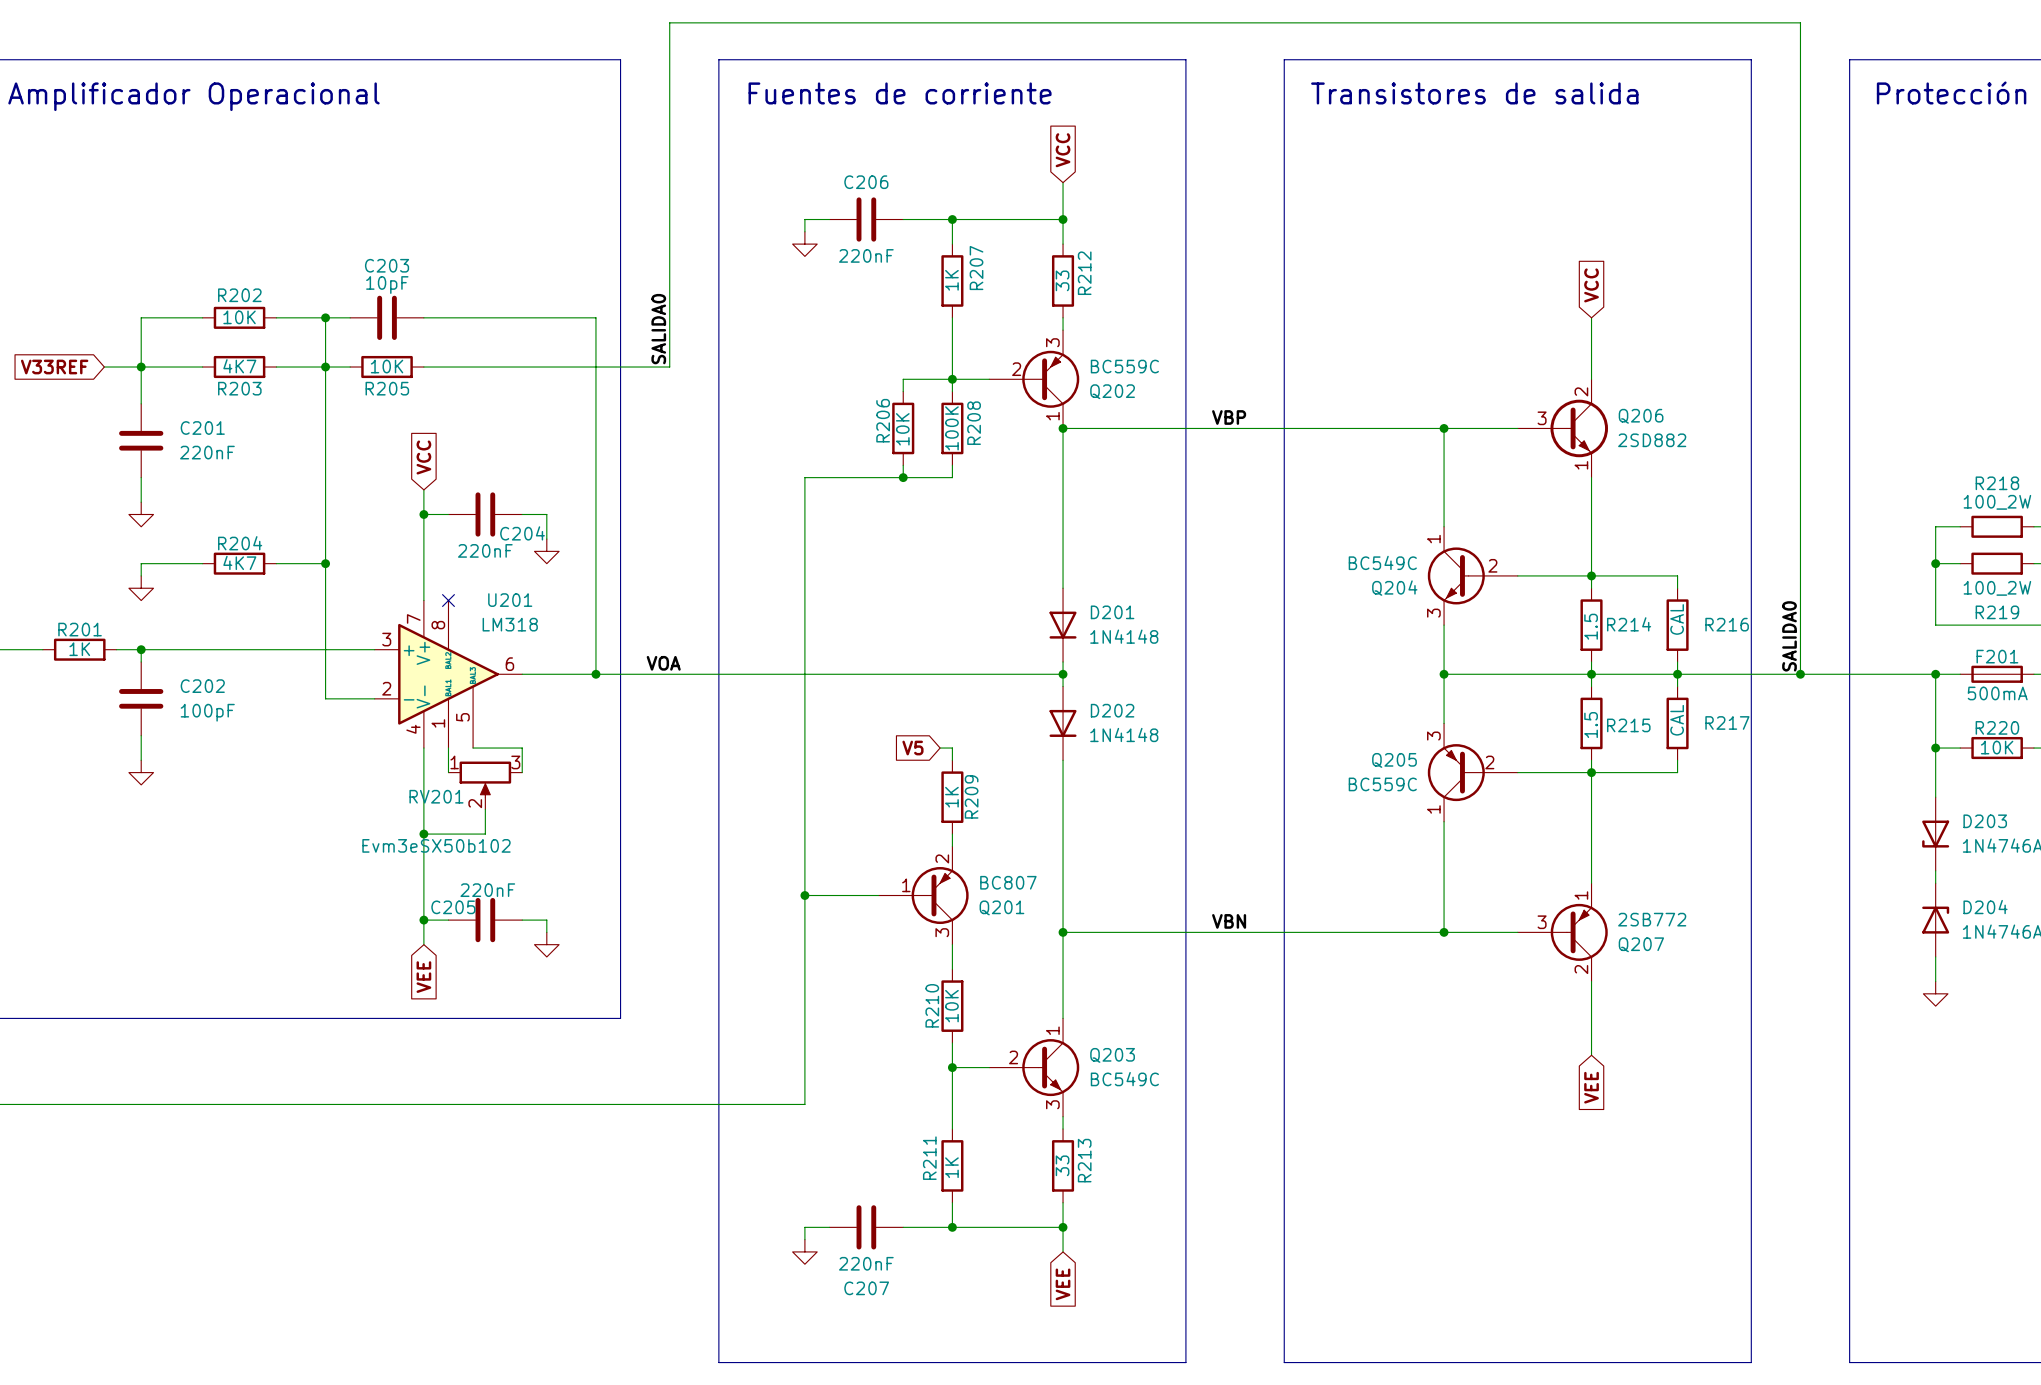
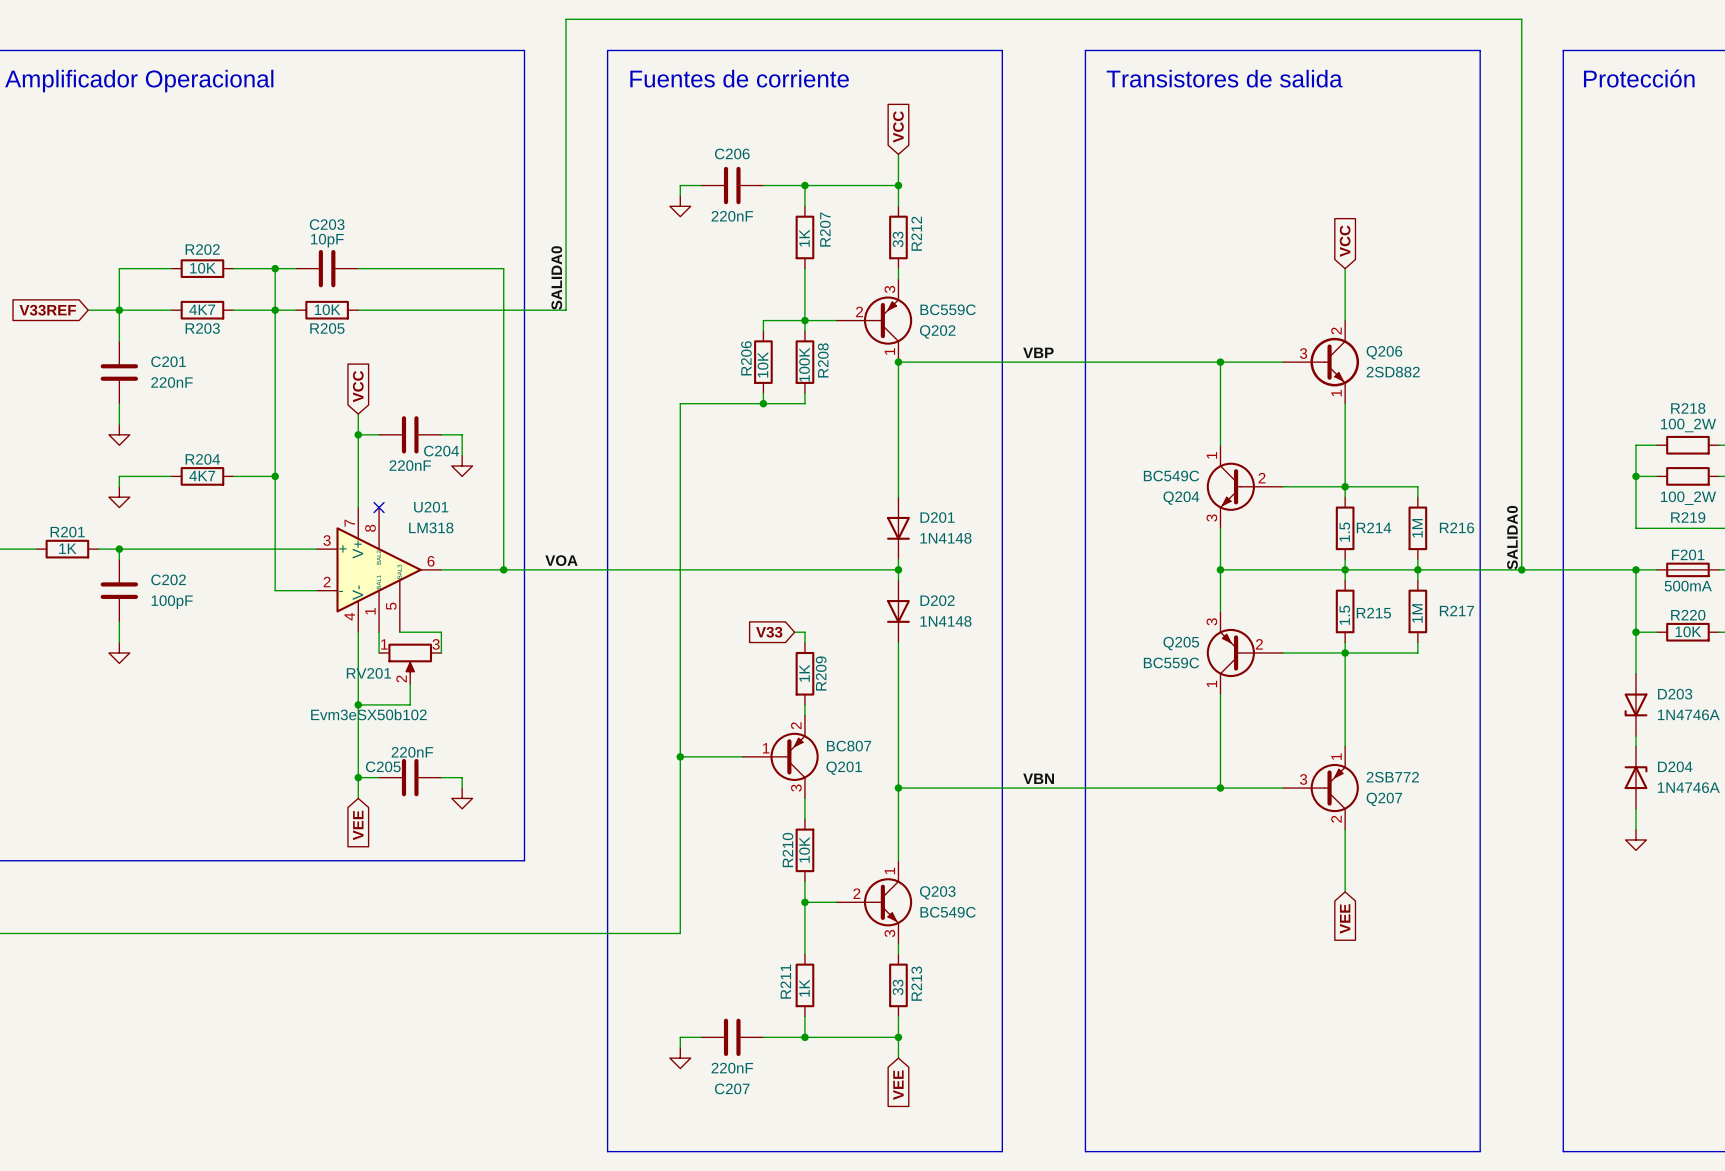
R216 value: CAL (1677, 619) -> 1M (1417, 528)
R217 value: CAL (1677, 720) -> 1M (1417, 613)
global label: V5 (912, 748) -> V33 (769, 632)

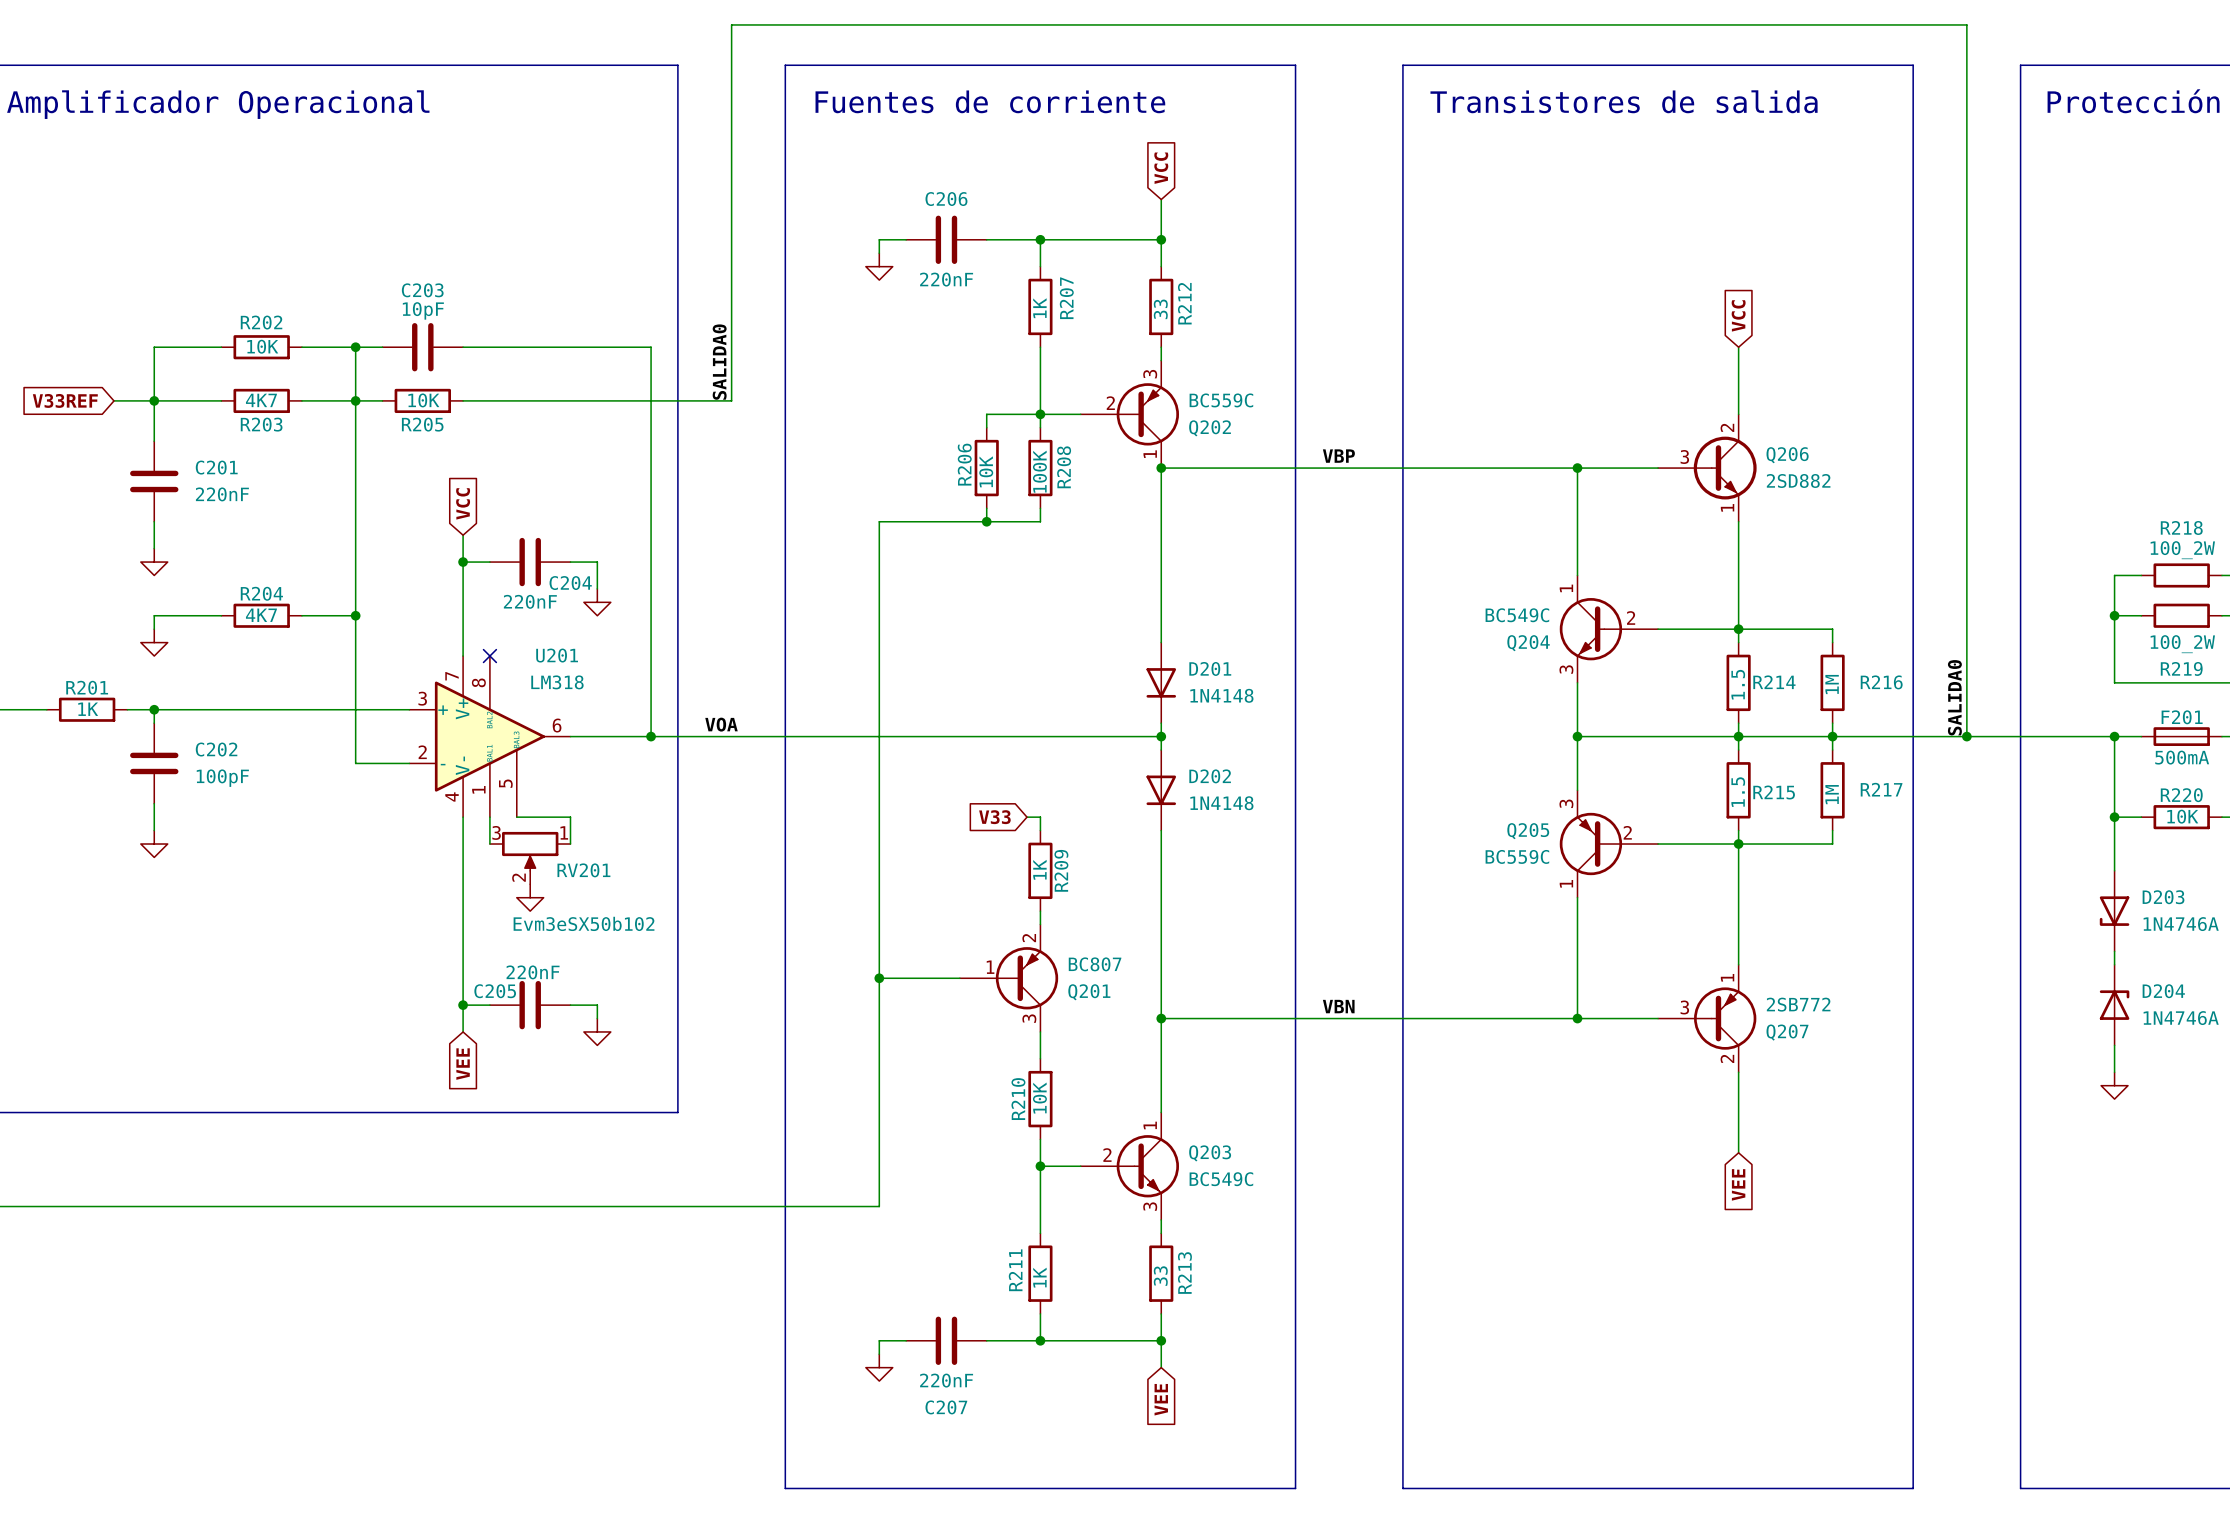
RV201 flip: as is (410, 658) -> left-right (530, 851)
wire: (410, 684) (410, 704) (358, 704) -> none
power symbol: none -> (530, 897)
junction: (358, 704) -> none

